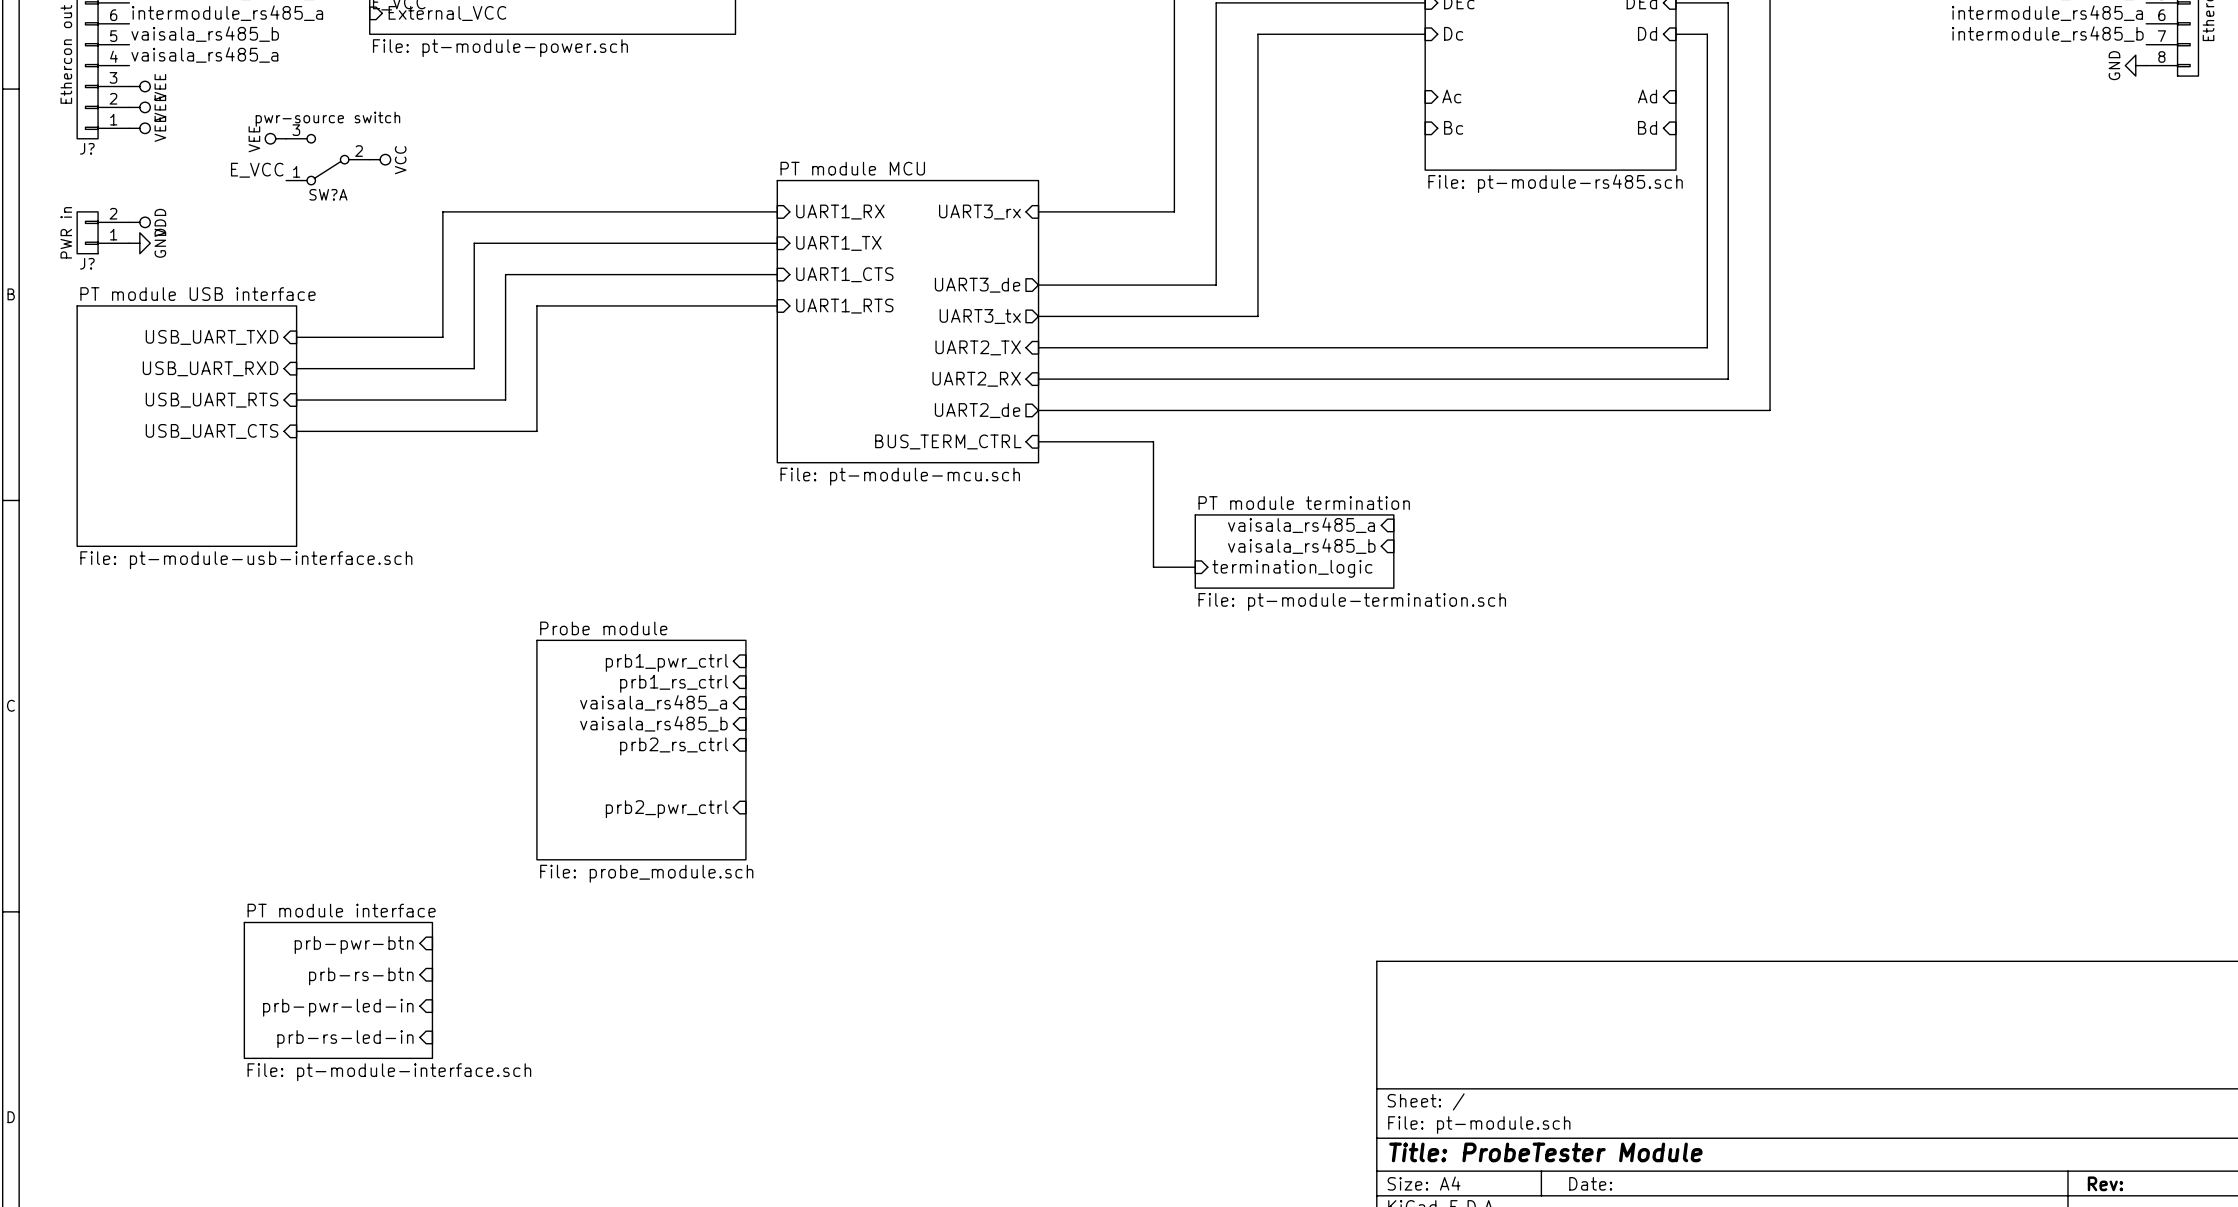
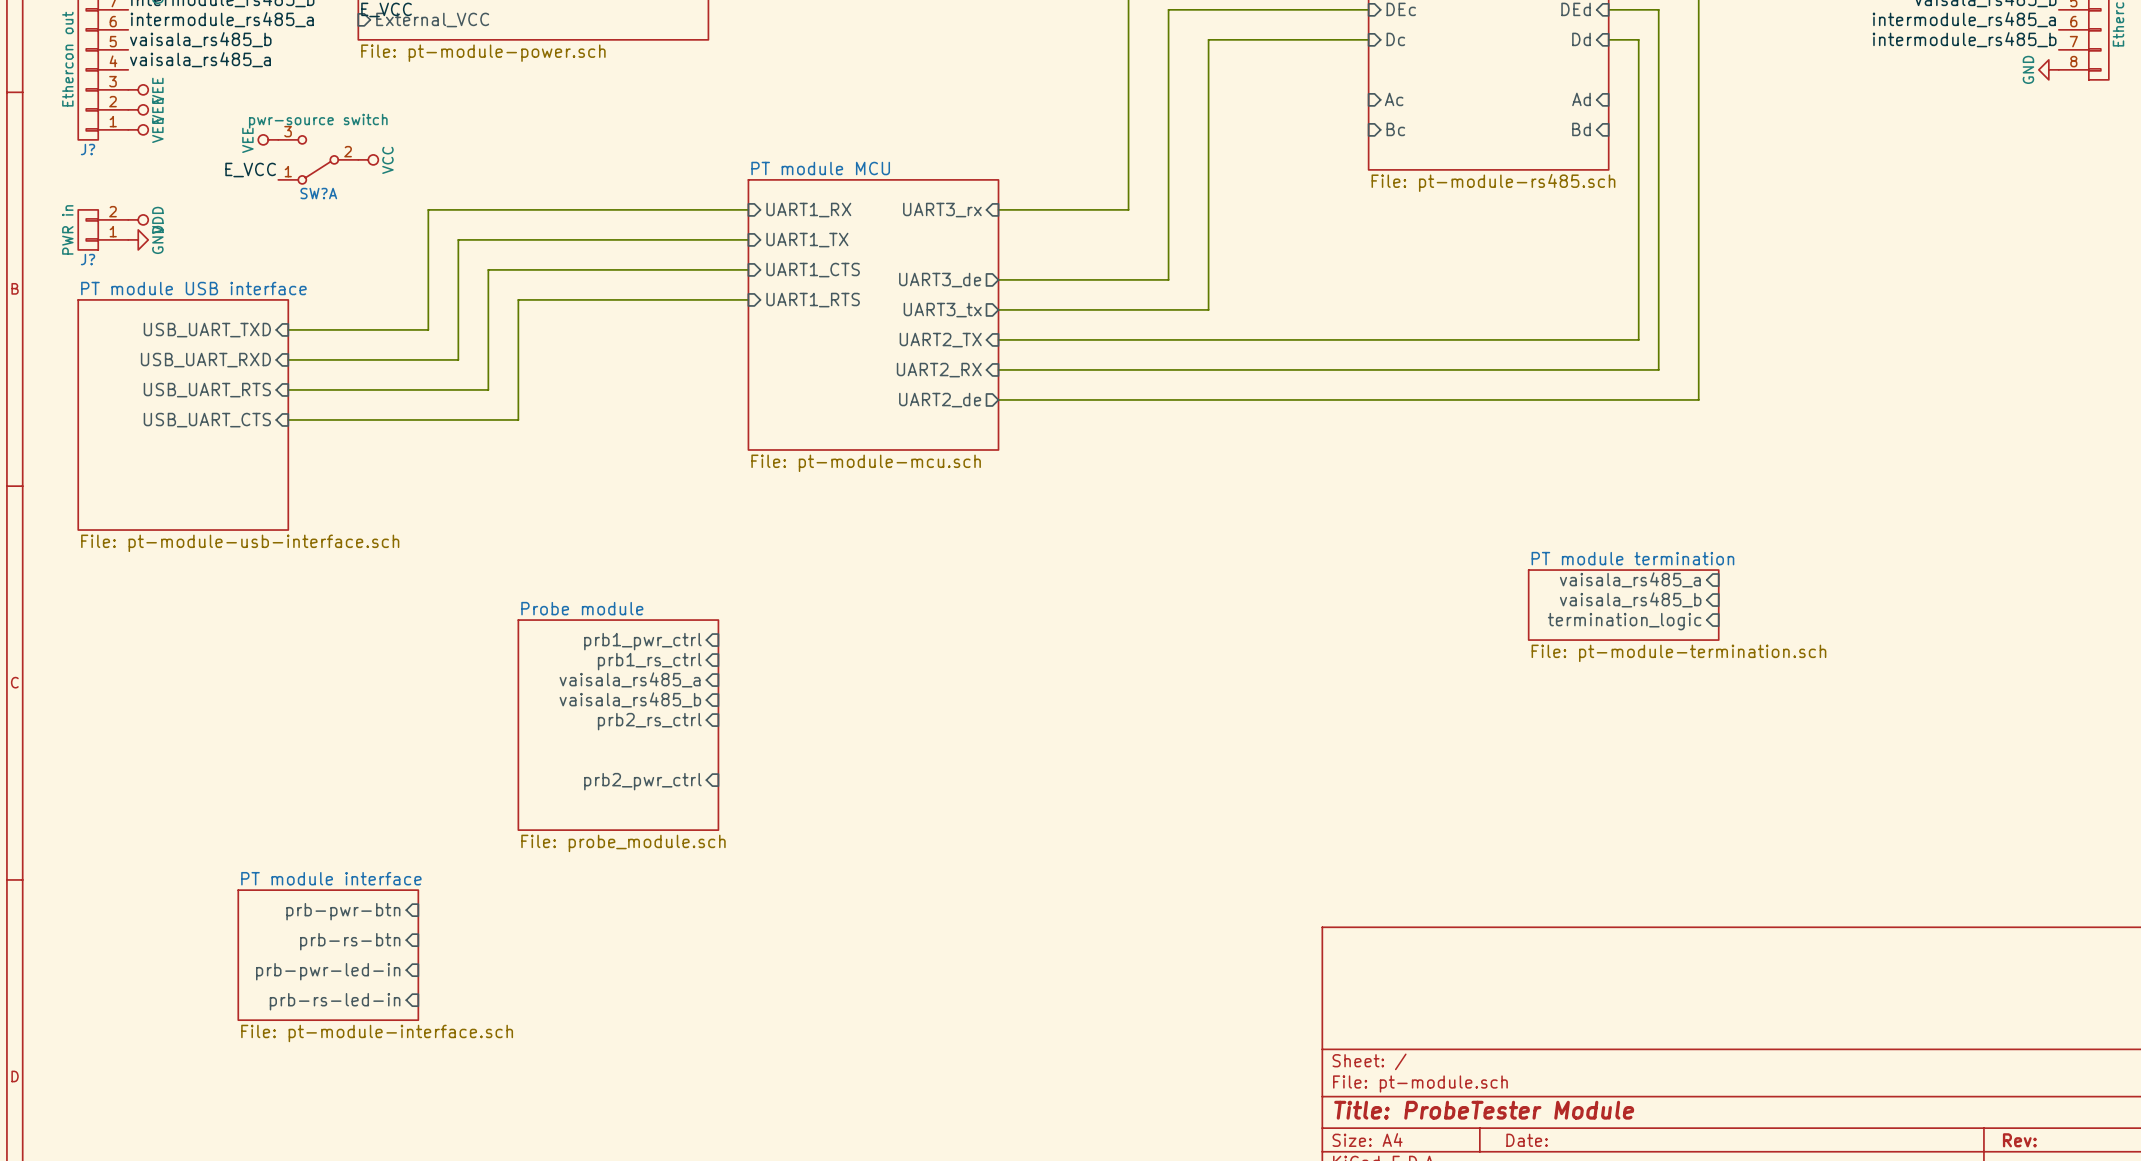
sheet pin: BUS_TERM_CTRL (948, 441) -> none
wire: (1038, 441) (1153, 441) (1153, 567) (1195, 567) -> none
sheet pin: vaisala_rs485_a (1301, 525) -> none
sheet pin: vaisala_rs485_b (1301, 546) -> none
sheet PT module termination: File: pt-module-termination.sch (1294, 551) -> none
sheet pin: termination_logic (1292, 568) -> none
sheet pin: none -> vaisala_rs485_a (1630, 579)
sheet pin: none -> vaisala_rs485_b (1630, 599)
sheet PT module termination: none -> File: pt-module-termination.sch (1623, 605)
sheet pin: none -> termination_logic (1624, 621)

